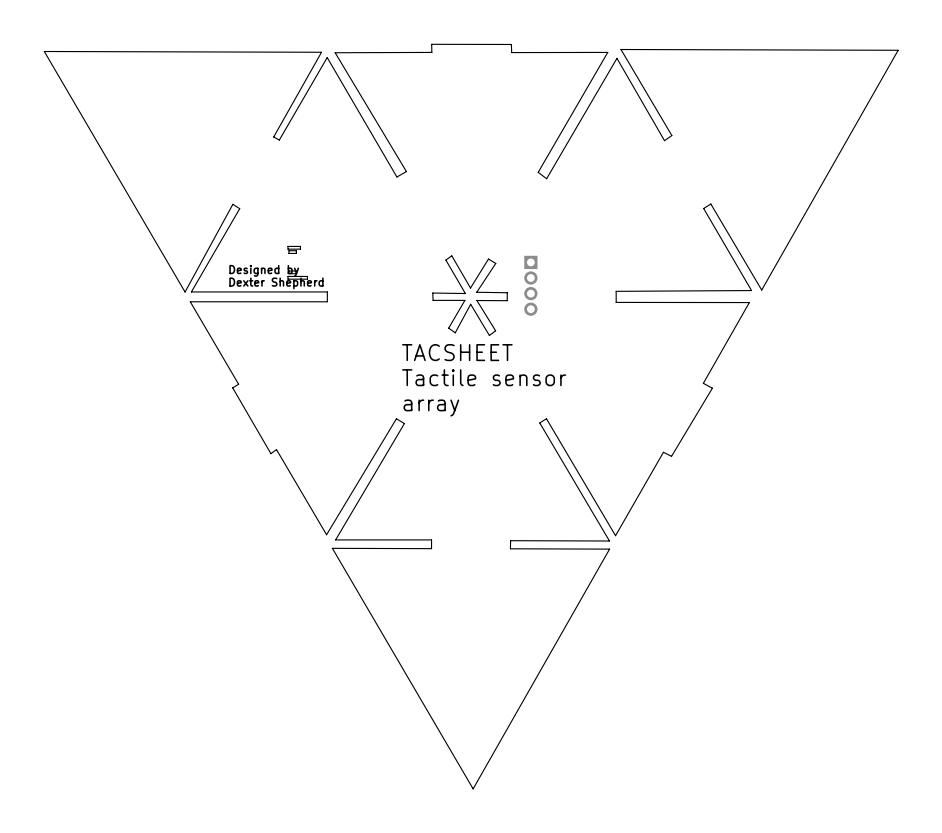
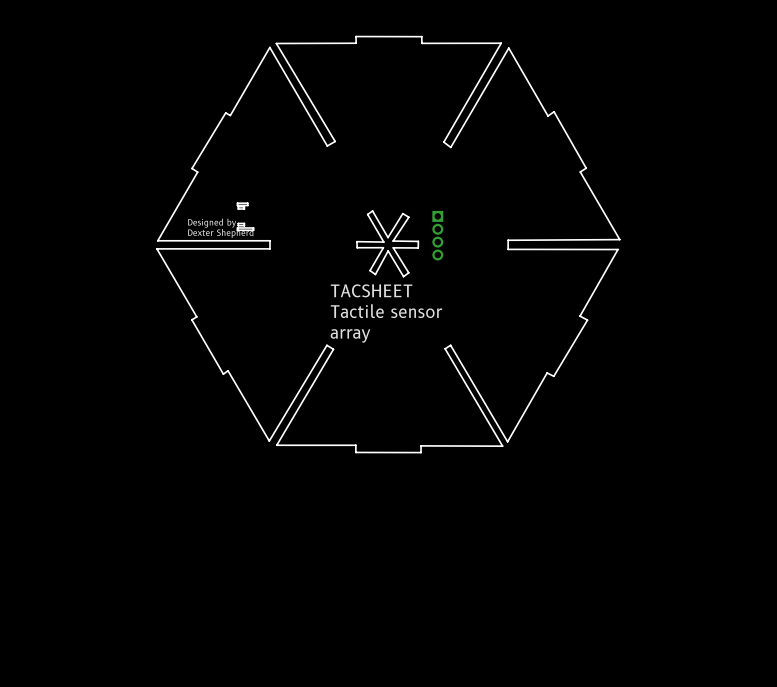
board edge: (671, 135) (620, 49) (898, 50) (761, 290) (710, 204) -> (554, 111) (586, 168)
board edge: (273, 136) (321, 52) (44, 51) (185, 292) (232, 204) -> (225, 112) (192, 168)
board edge: (431, 548) (332, 548) (473, 788) (609, 549) (510, 548) -> (355, 452) (420, 452)

